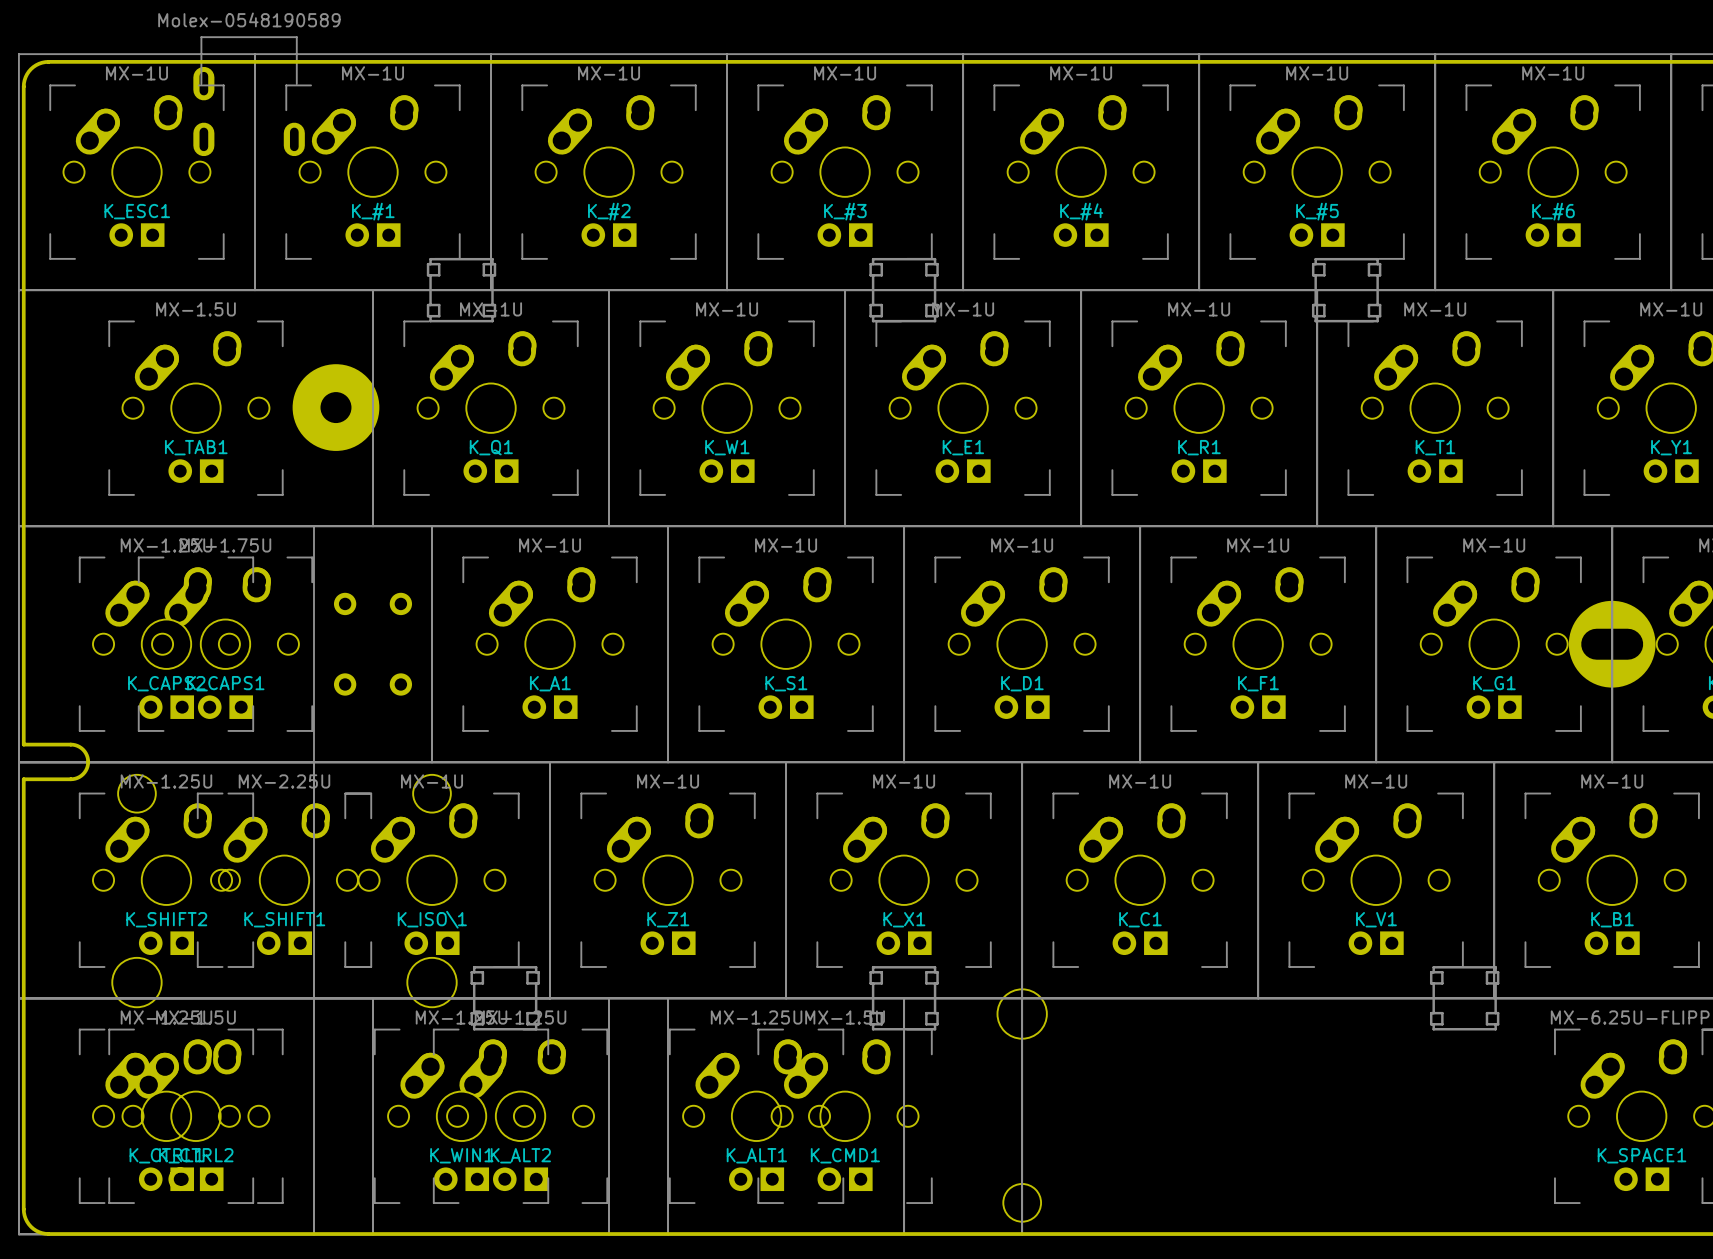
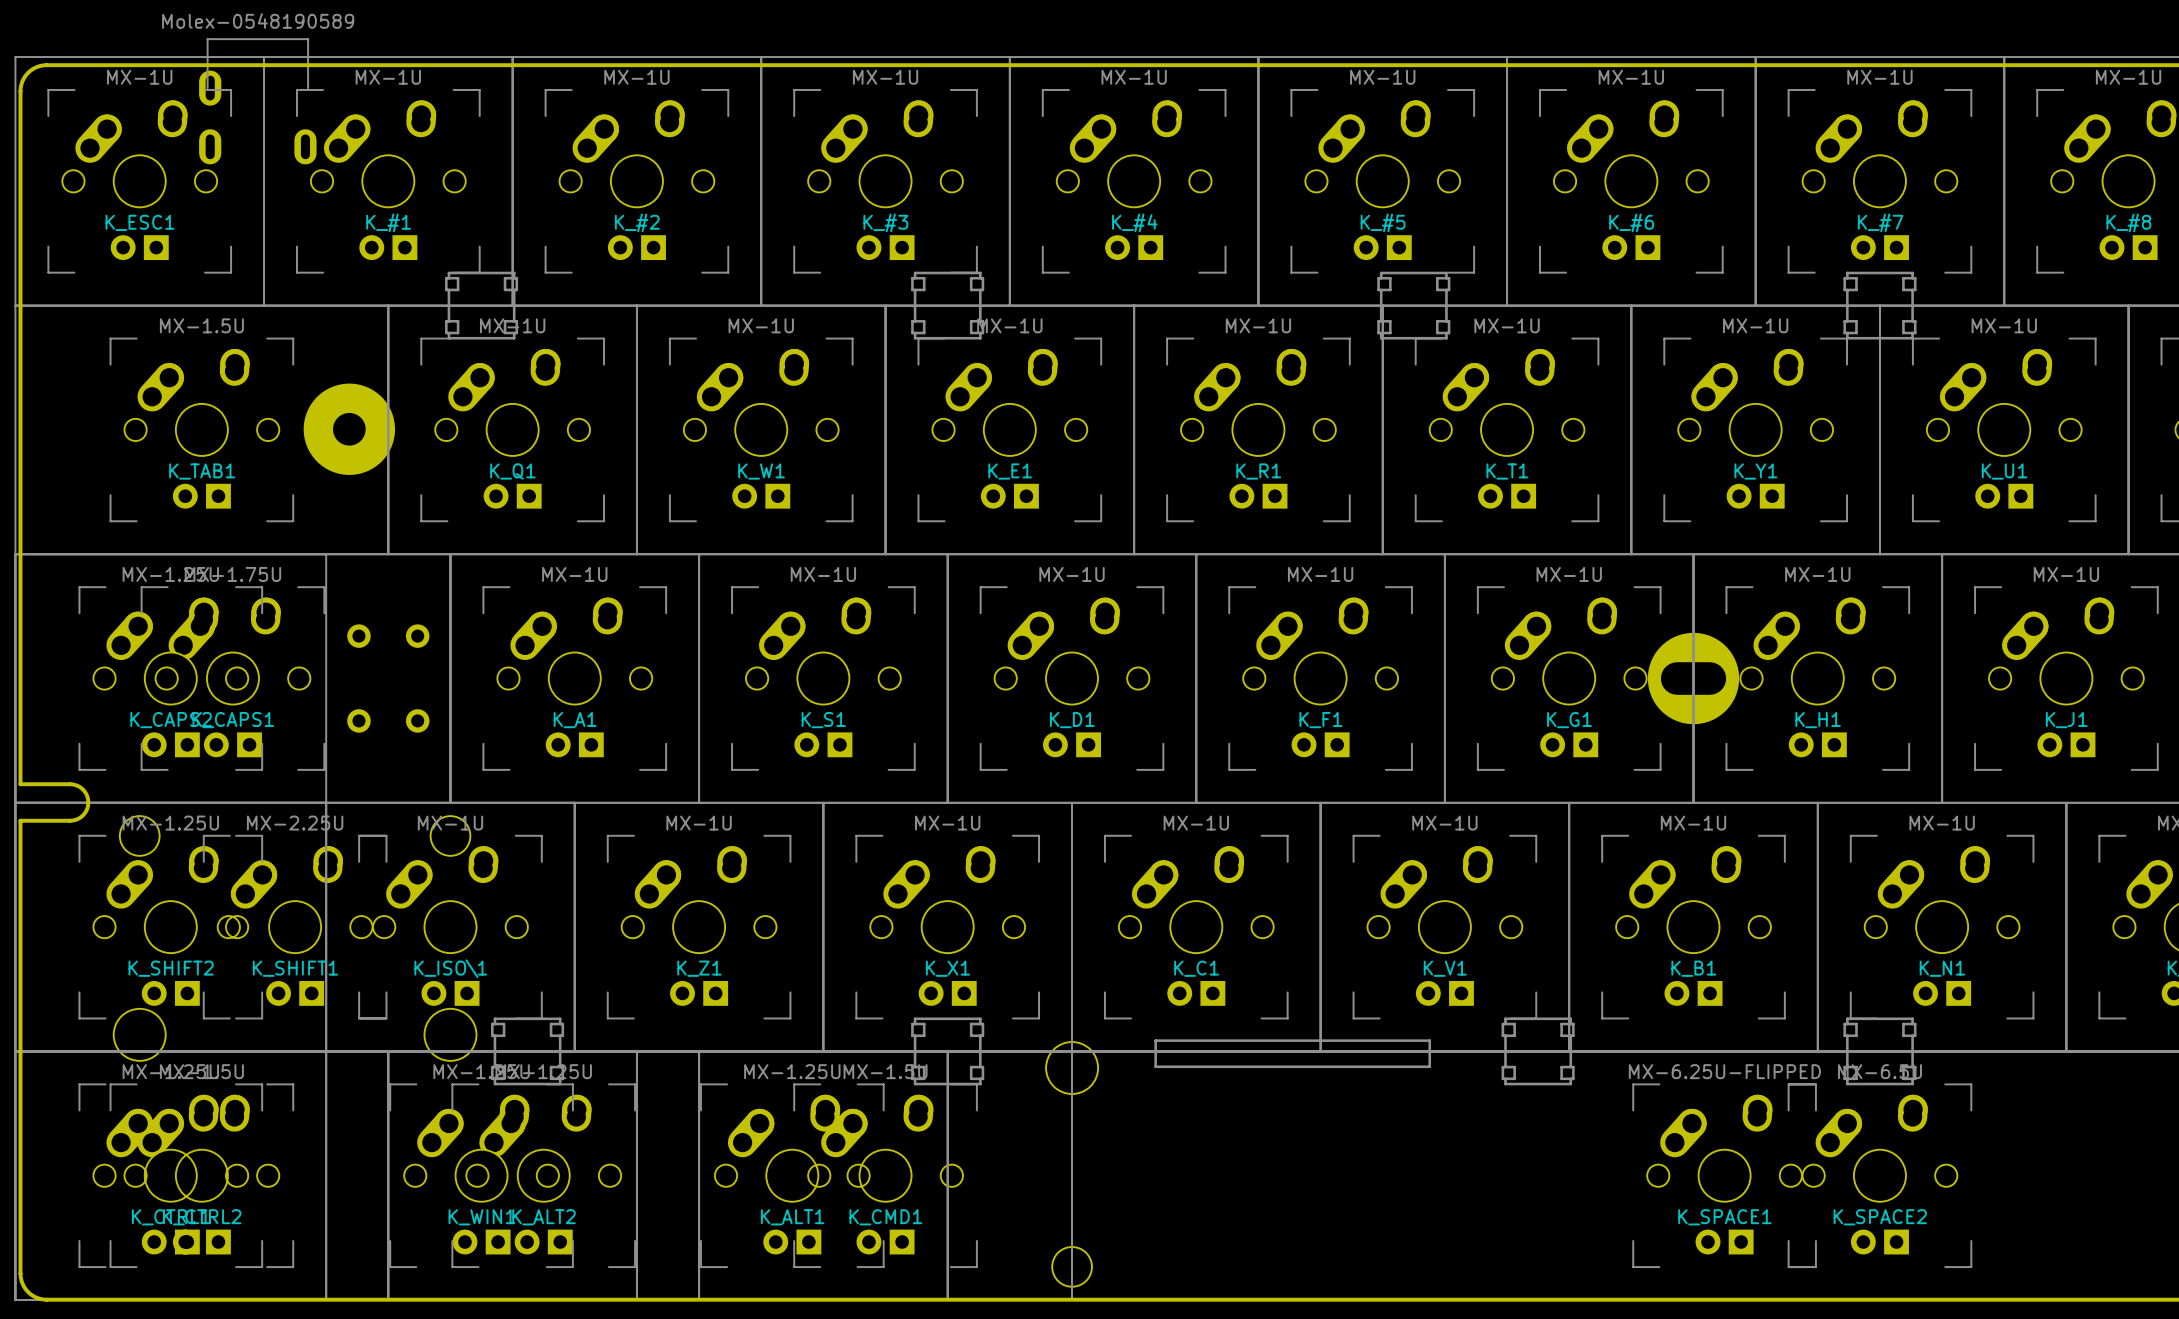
line: none -> (1155, 1040) (1155, 1066) (1429, 1066) (1429, 1040) (1155, 1040)

